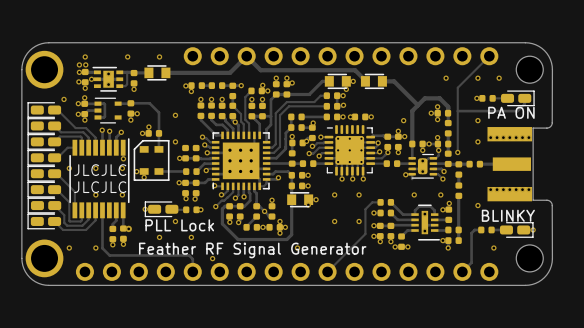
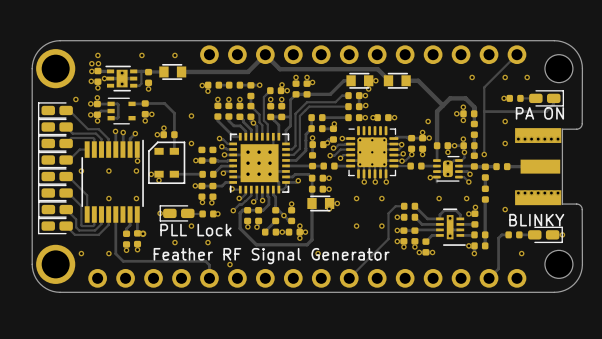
via: none -> (402, 161)
text: JLCJLC (100, 170) -> none
text: JLCJLC (100, 187) -> none

